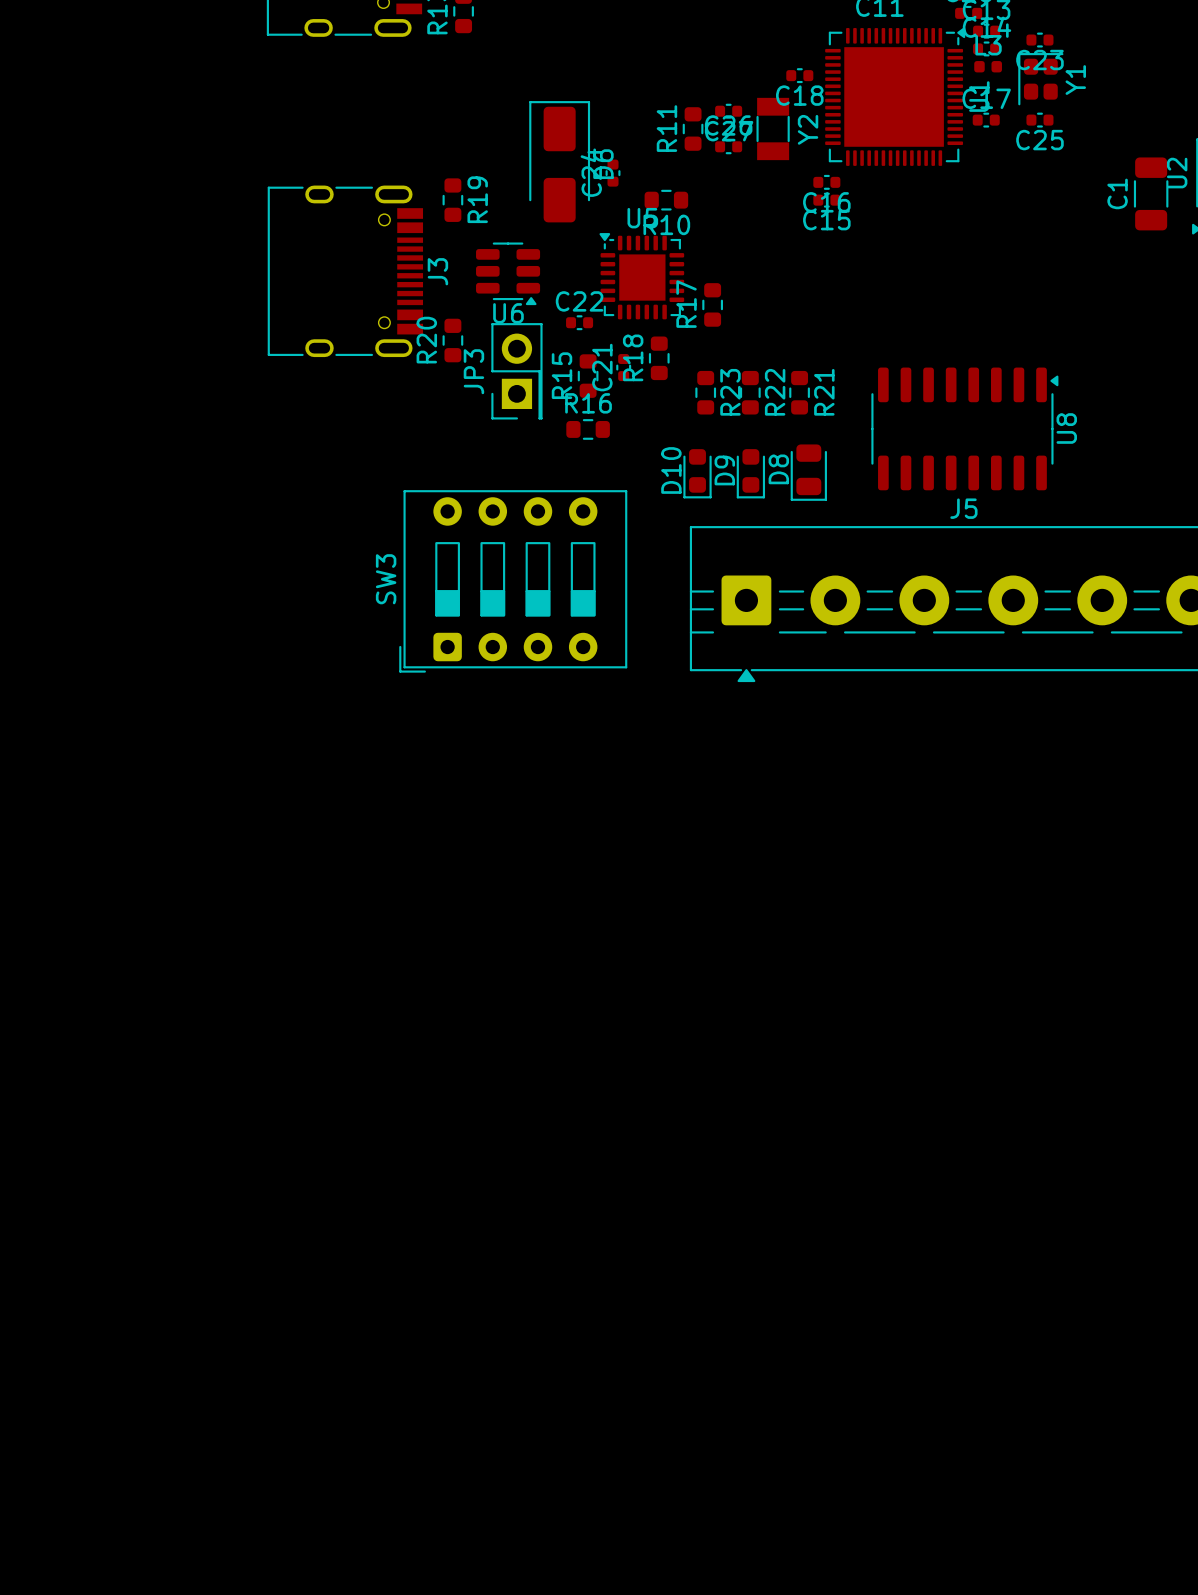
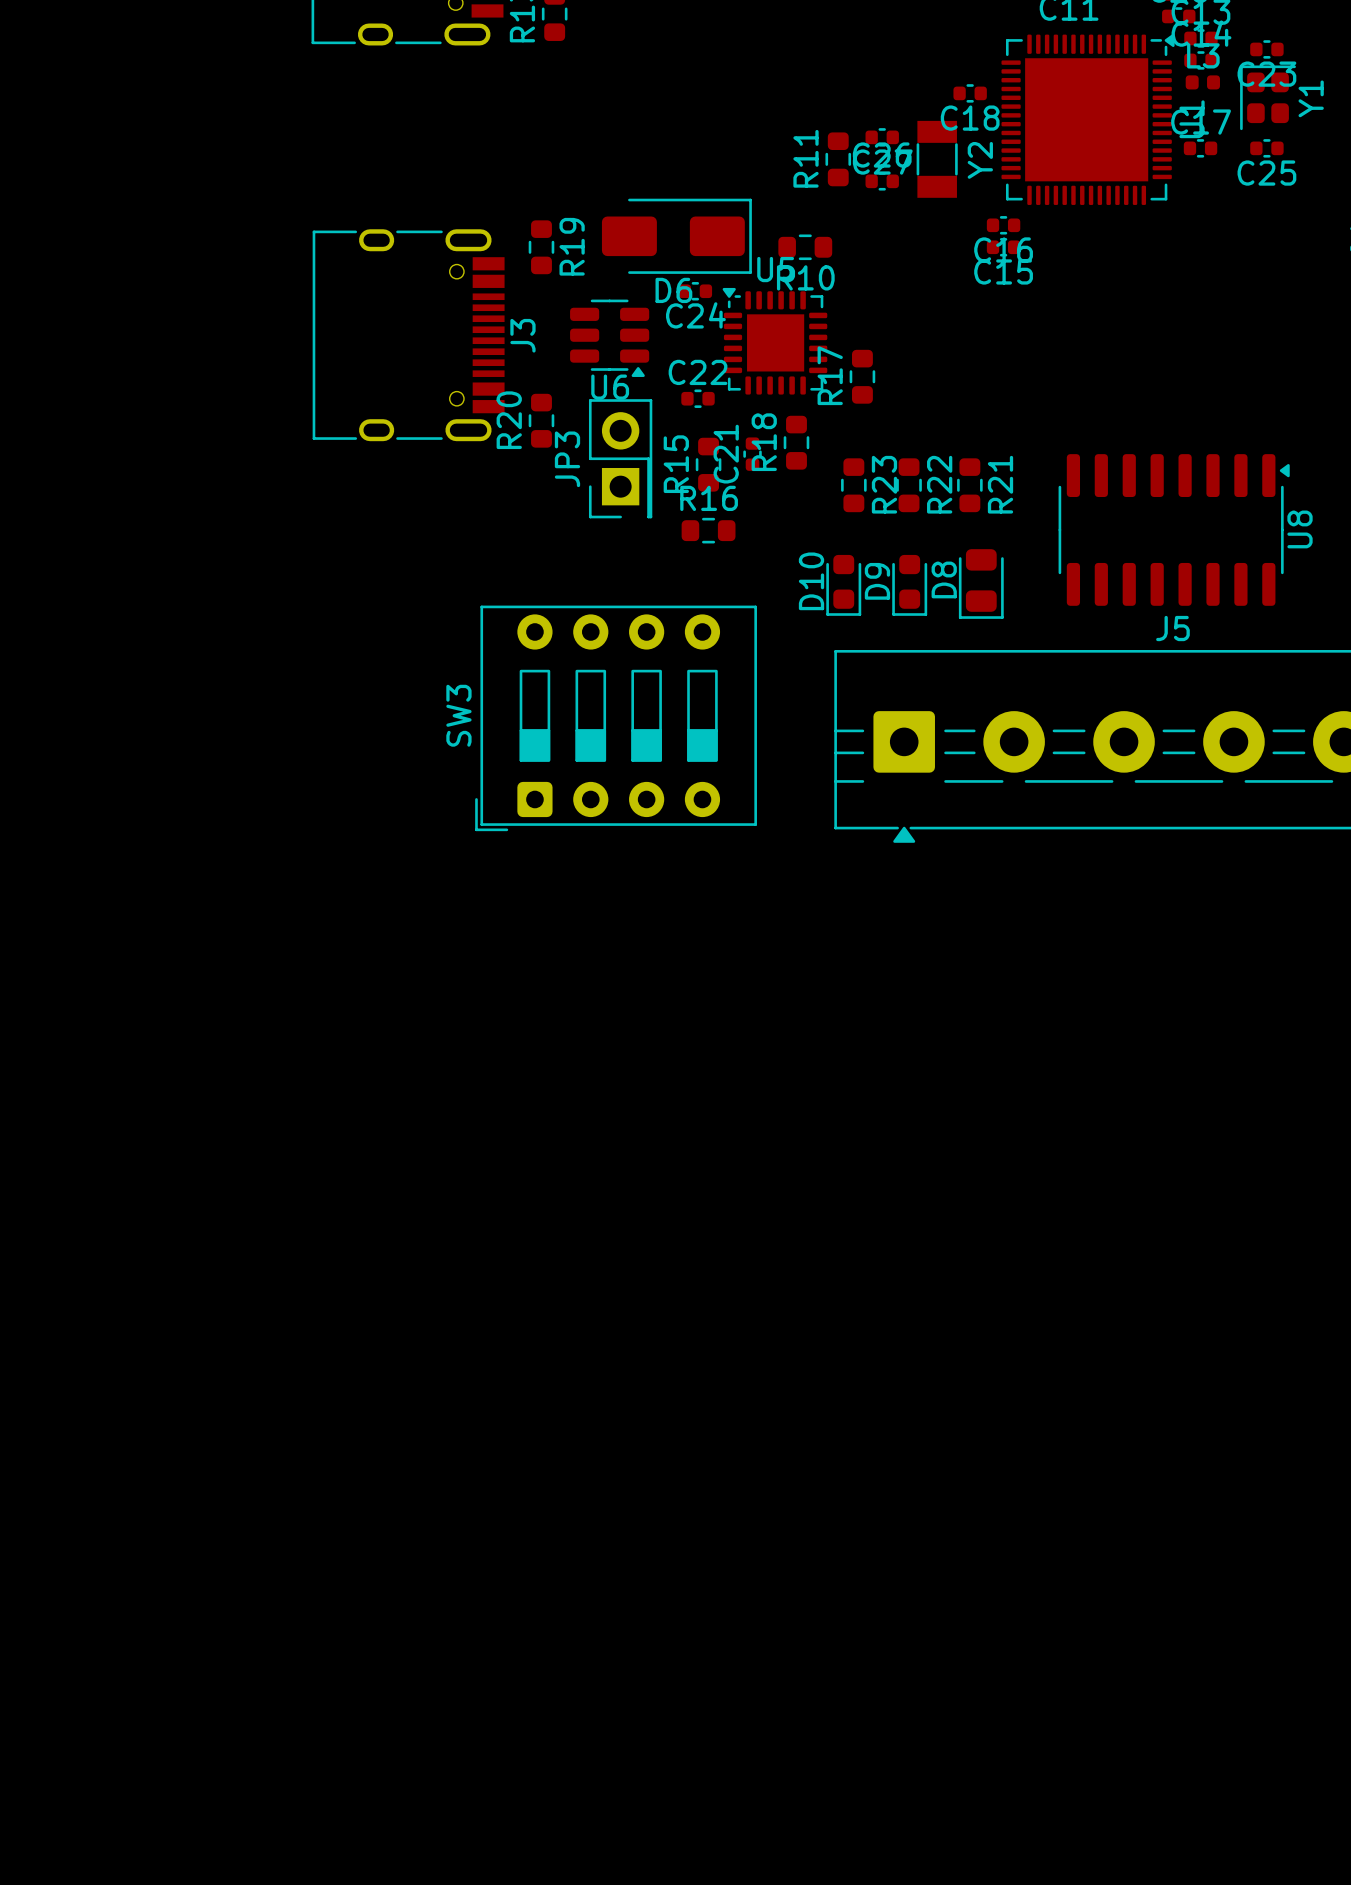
D6 rotation: 0° (559, 161) -> 90° clockwise (676, 236)
C24 rotation: 0° (613, 173) -> 90° clockwise (695, 291)
C24 position: (613, 173) -> (695, 291)

